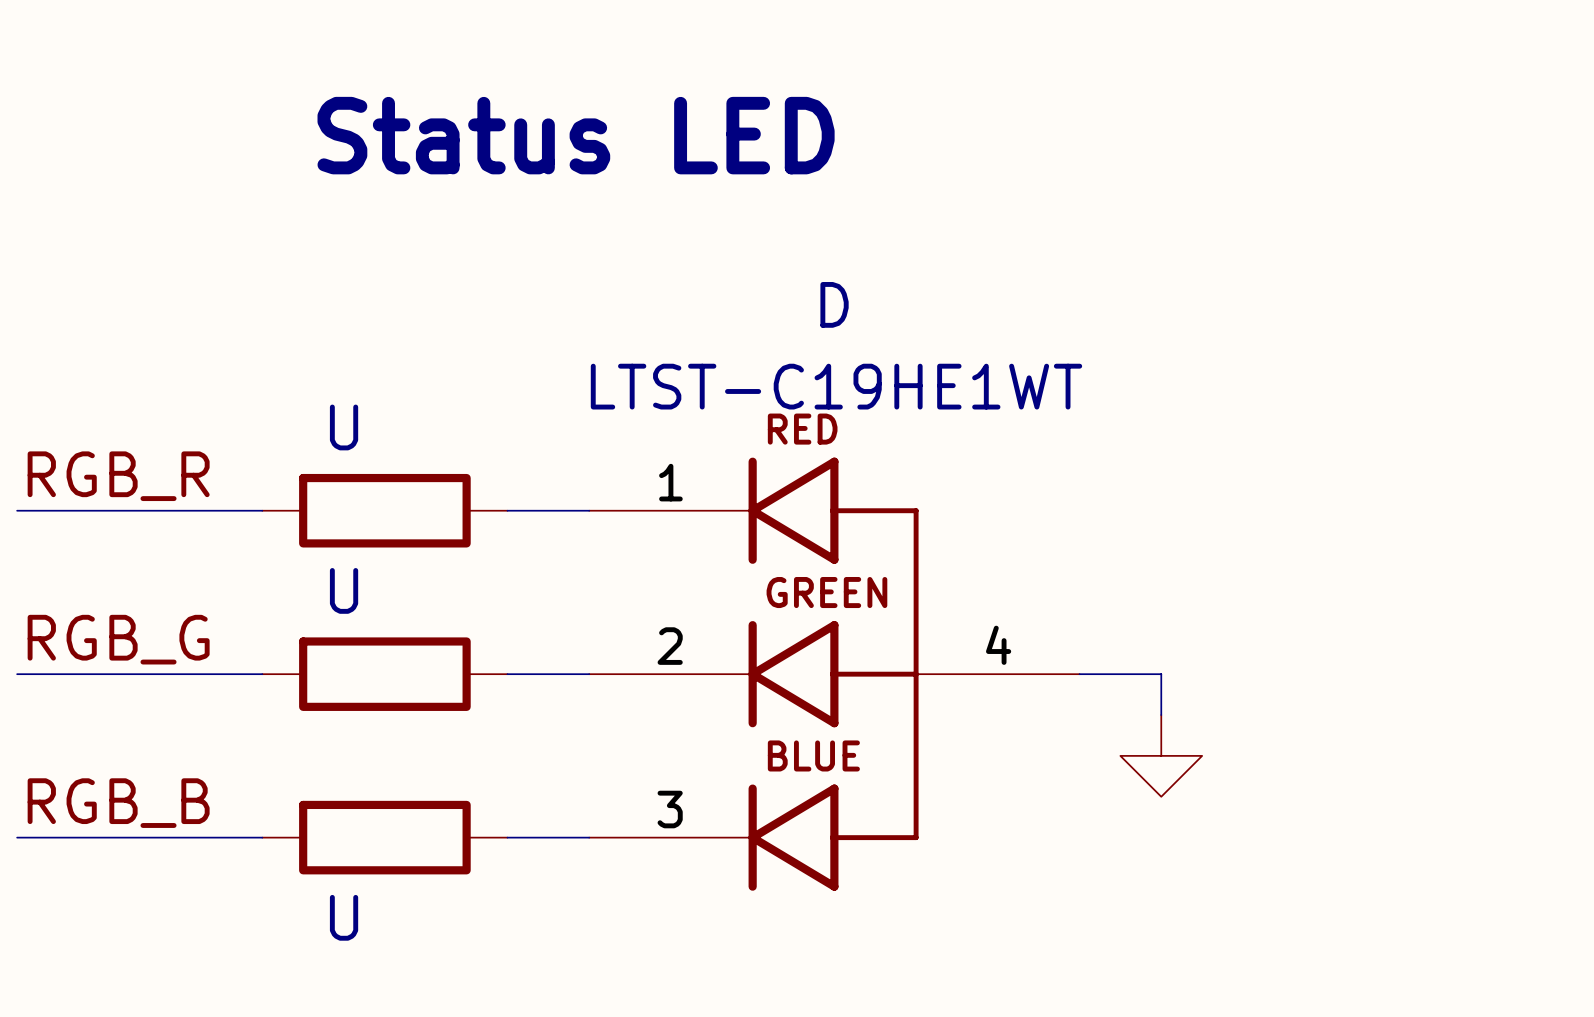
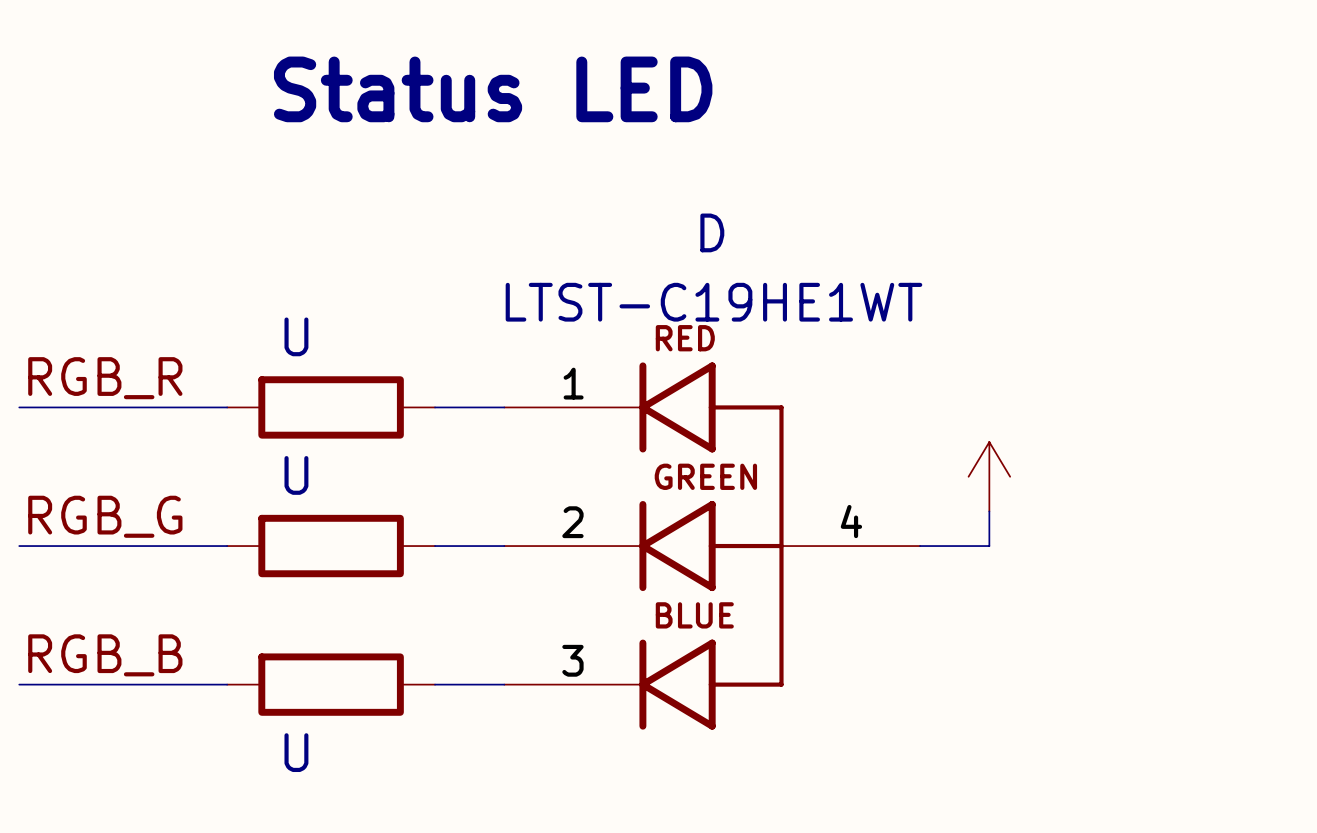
power symbol: none -> (989, 476)
wire: (1161, 674) (1161, 715) -> (989, 546) (989, 511)
power symbol: (1161, 755) -> none

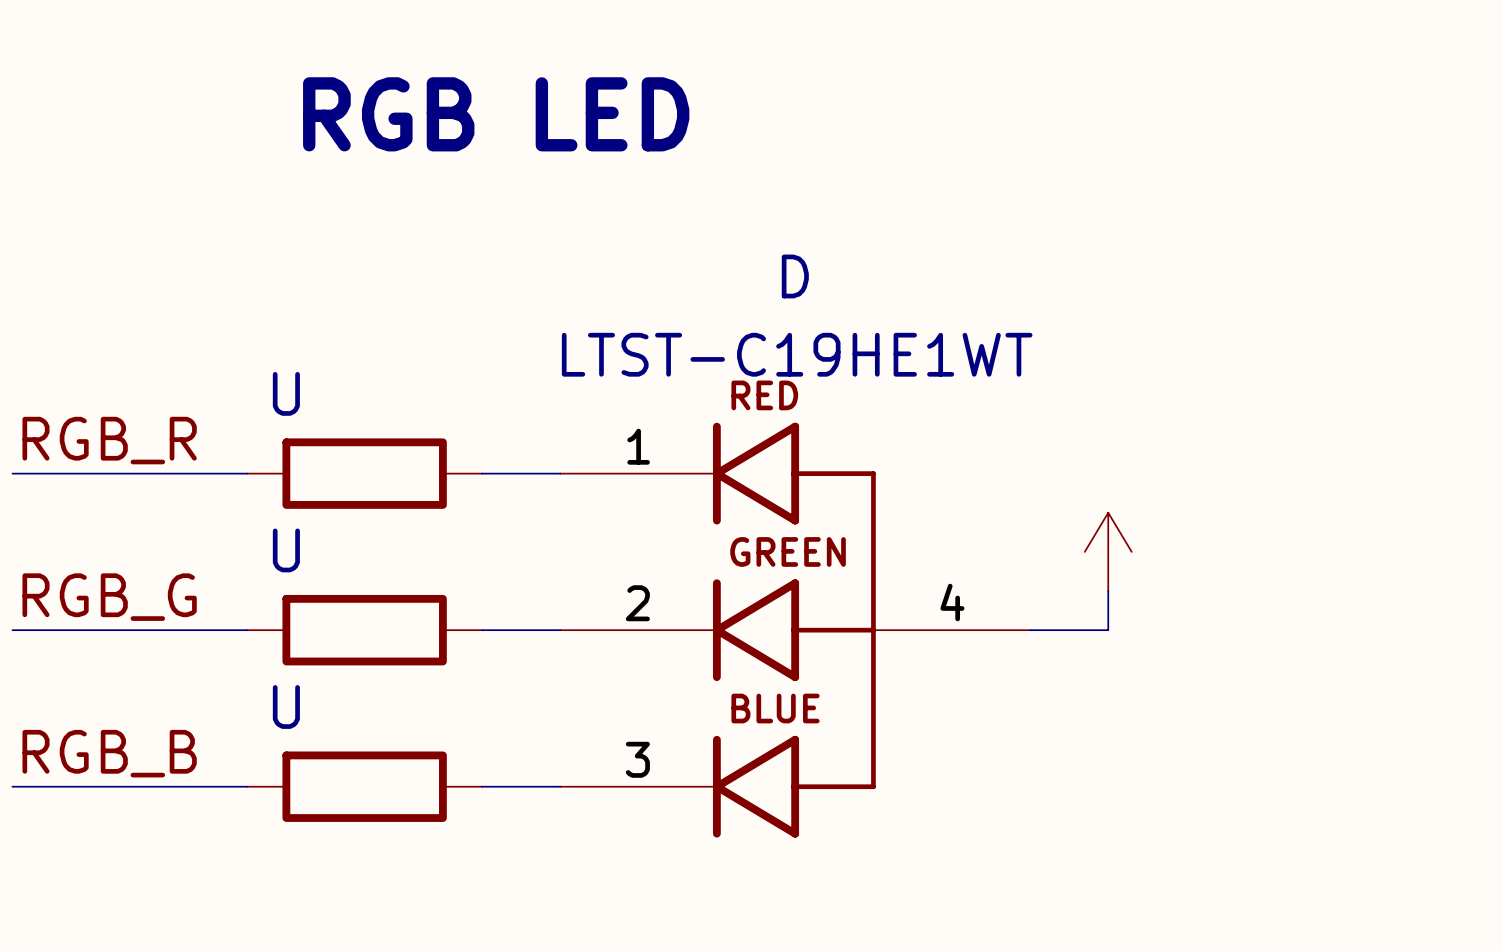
text: Status LED (493, 89) -> RGB LED (496, 114)
U name position: U (296, 336) -> U (286, 393)
U name position: U (296, 475) -> U (286, 550)
U name position: U (296, 752) -> U (286, 706)

